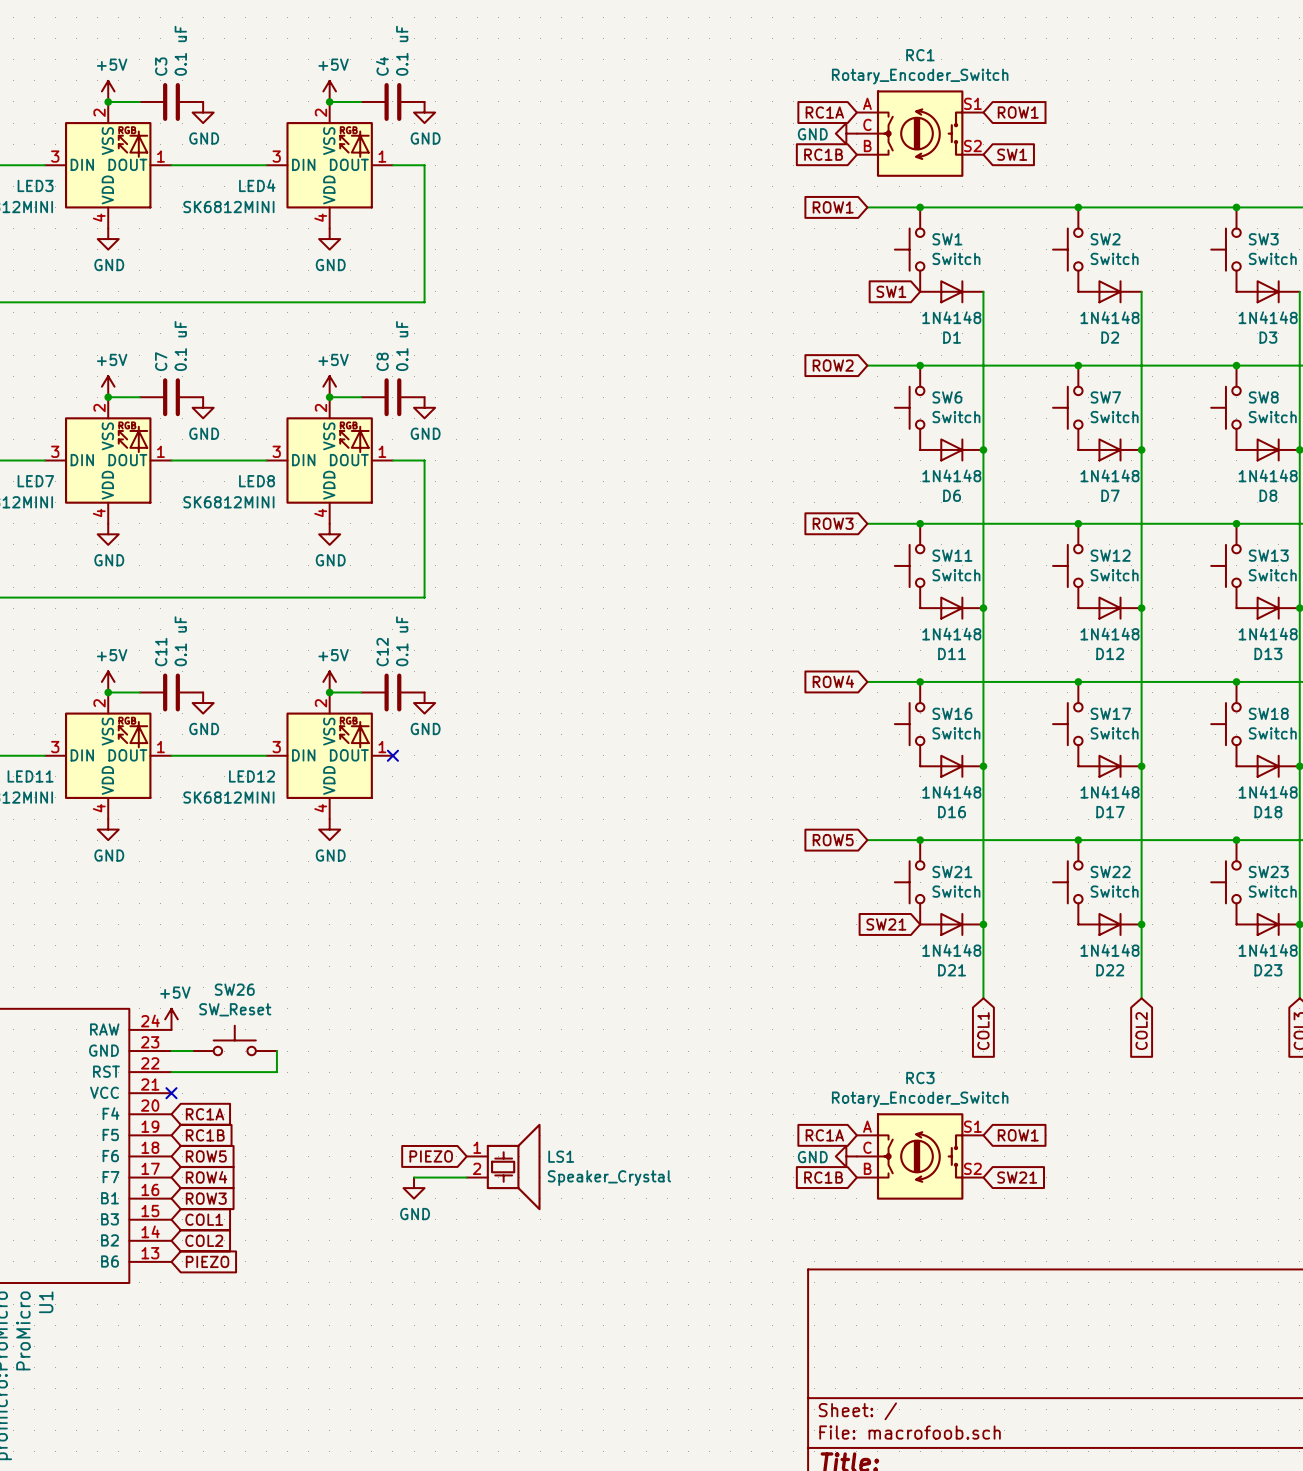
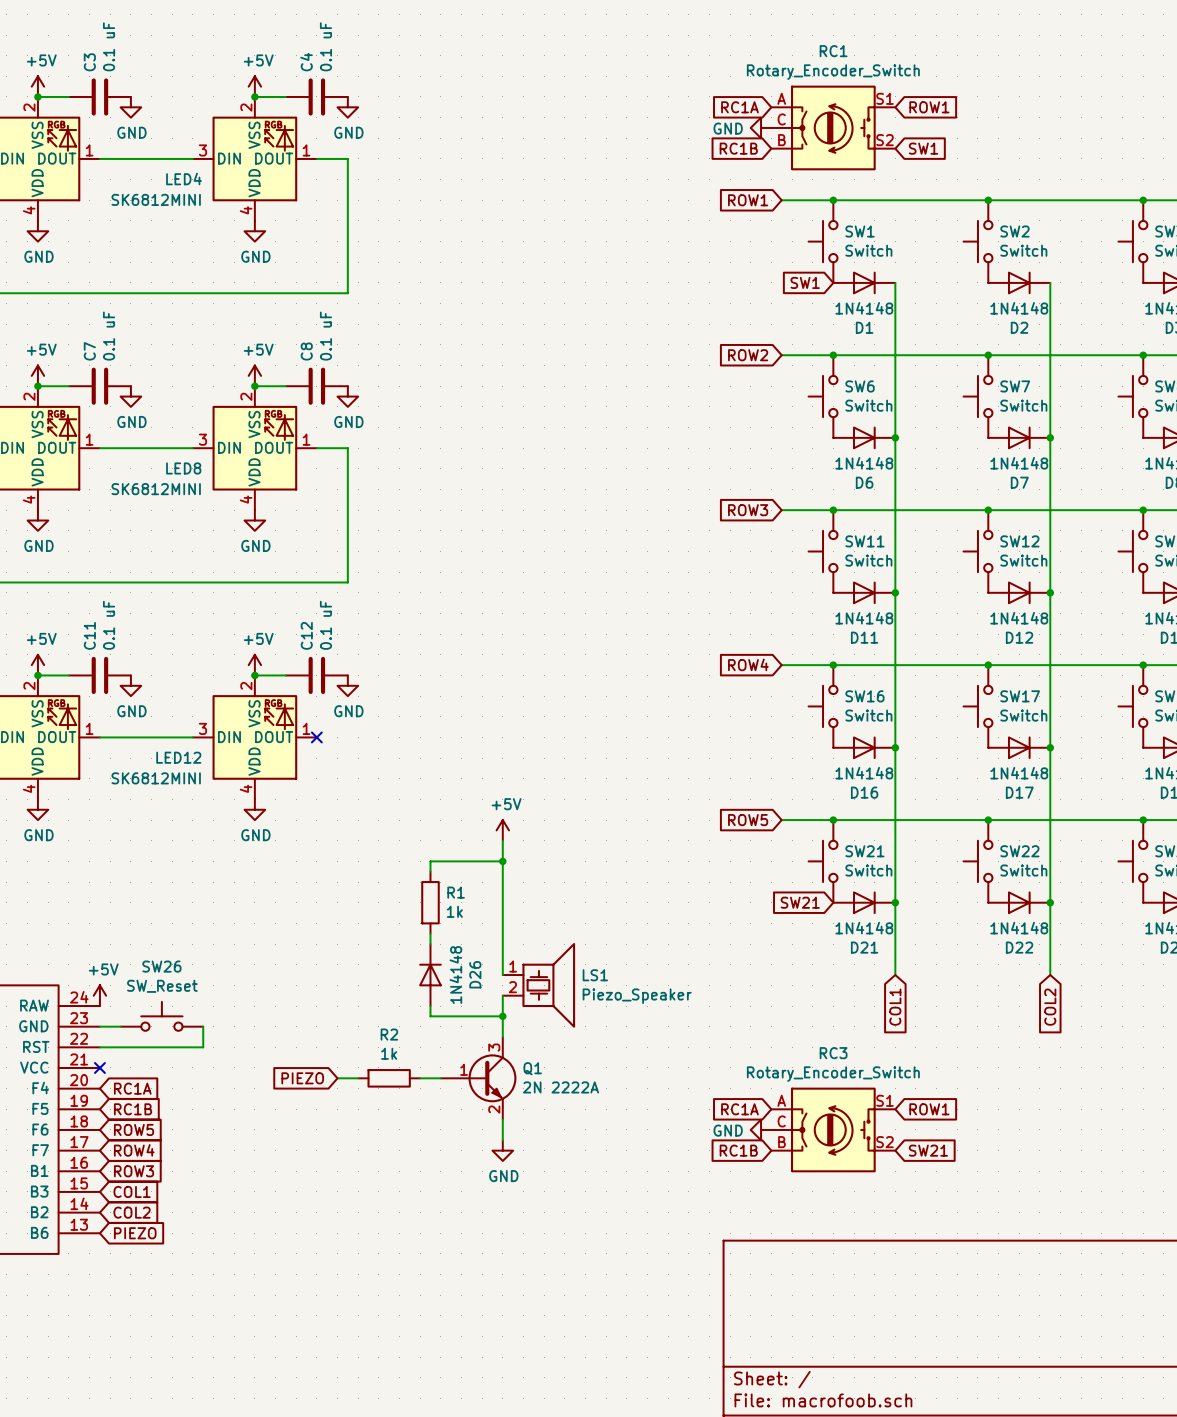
power symbol: none -> +5V (502, 830)
wire: none -> (502, 840) (502, 975)
wire: none -> (502, 861) (430, 861) (430, 871)
junction: none -> (502, 861)
R1: none -> 1k (430, 902)
wire: none -> (430, 933) (430, 944)
D26: none -> 1N4148 (430, 975)
wire: none -> (502, 995) (502, 1037)
wire: none -> (430, 1006) (430, 1016) (502, 1016)
junction: none -> (502, 1016)
wire: none -> (337, 1078) (358, 1078)
R2: none -> 1k (389, 1078)
wire: none -> (420, 1078) (440, 1078)
Q1: none -> 2N 2222A (478, 1078)
wire: none -> (502, 1119) (502, 1140)
global label position: PIEZO (431, 1156) -> PIEZO (302, 1078)
LS1 position: (503, 1167) -> (538, 985)
wire: (414, 1177) (466, 1177) -> none
LS1 value: Speaker_Crystal (609, 1178) -> Piezo_Speaker (637, 996)
power symbol position: GND (414, 1188) -> GND (502, 1150)

